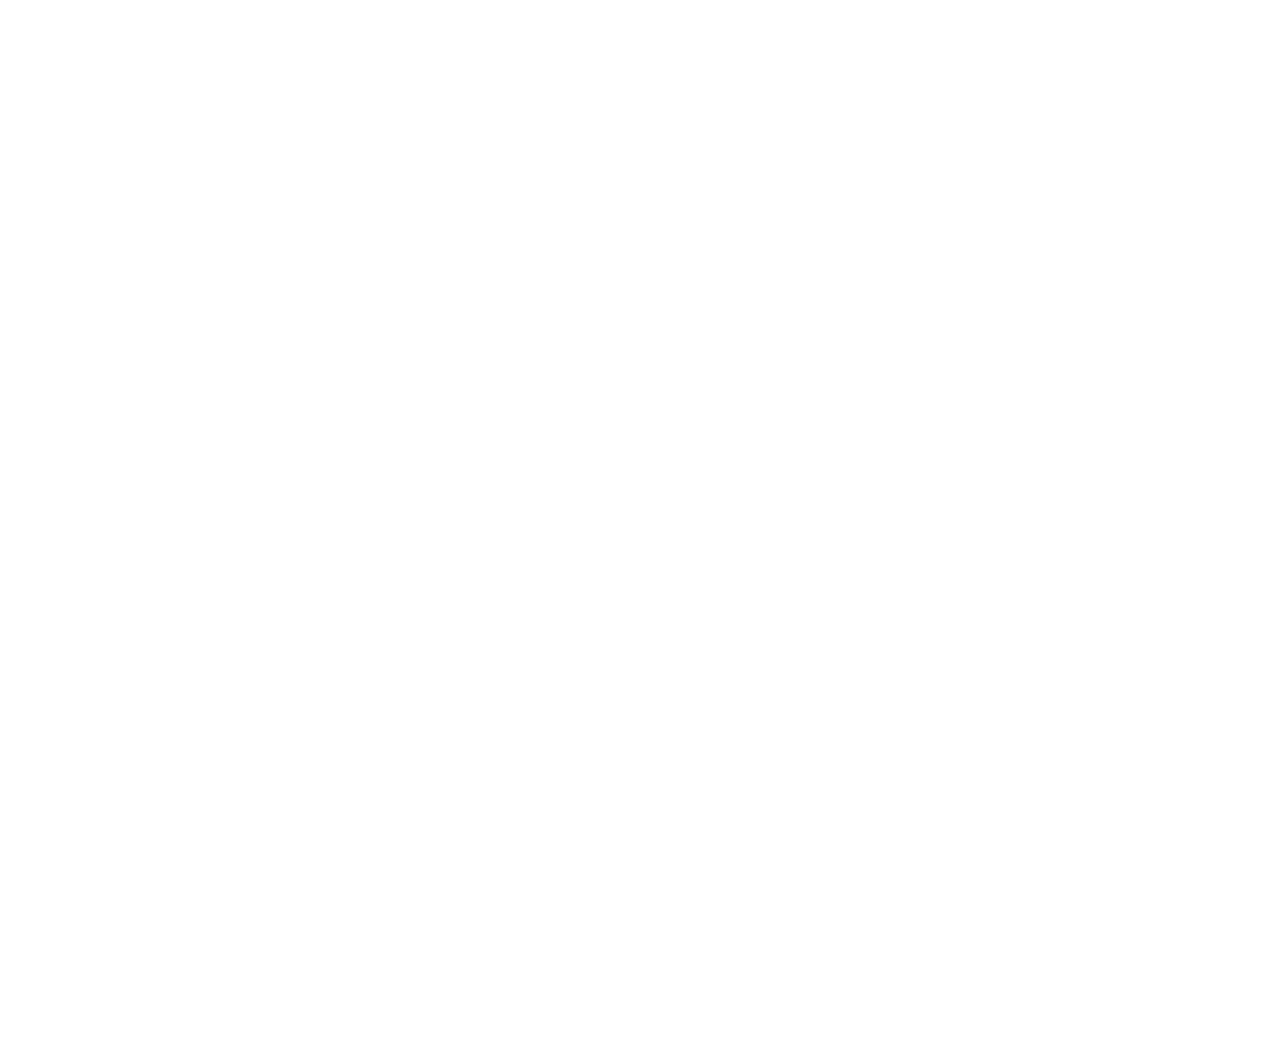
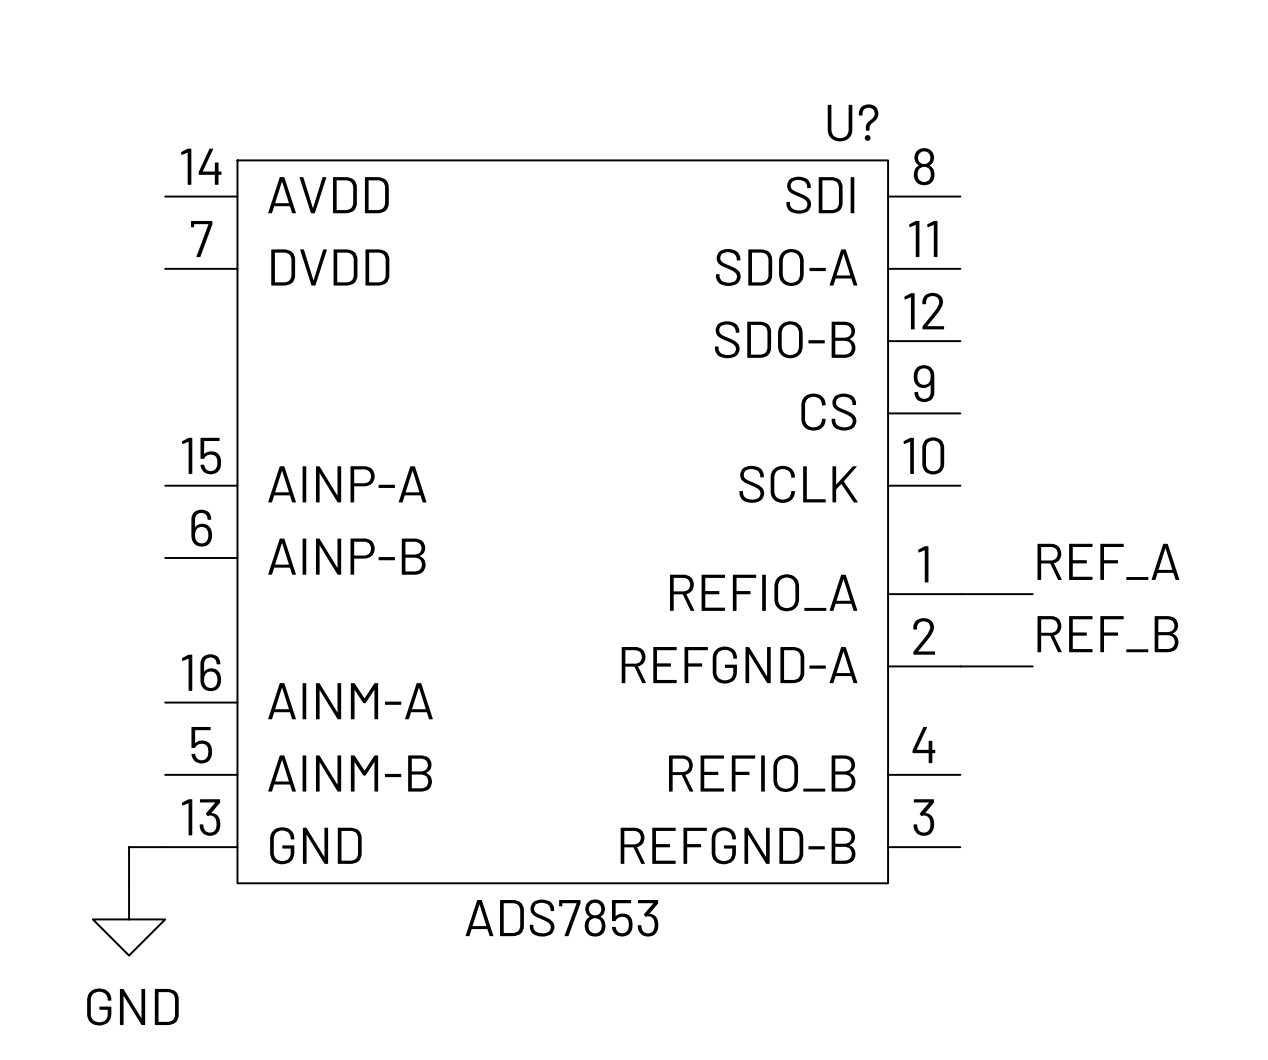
U?: none -> ADS7853 (562, 521)
label: none -> REF_A (1108, 561)
wire: none -> (960, 594) (1032, 594)
label: none -> REF_B (1107, 634)
wire: none -> (960, 666) (1032, 666)
wire: none -> (165, 847) (129, 847) (129, 883)
power symbol: none -> GND (129, 919)

